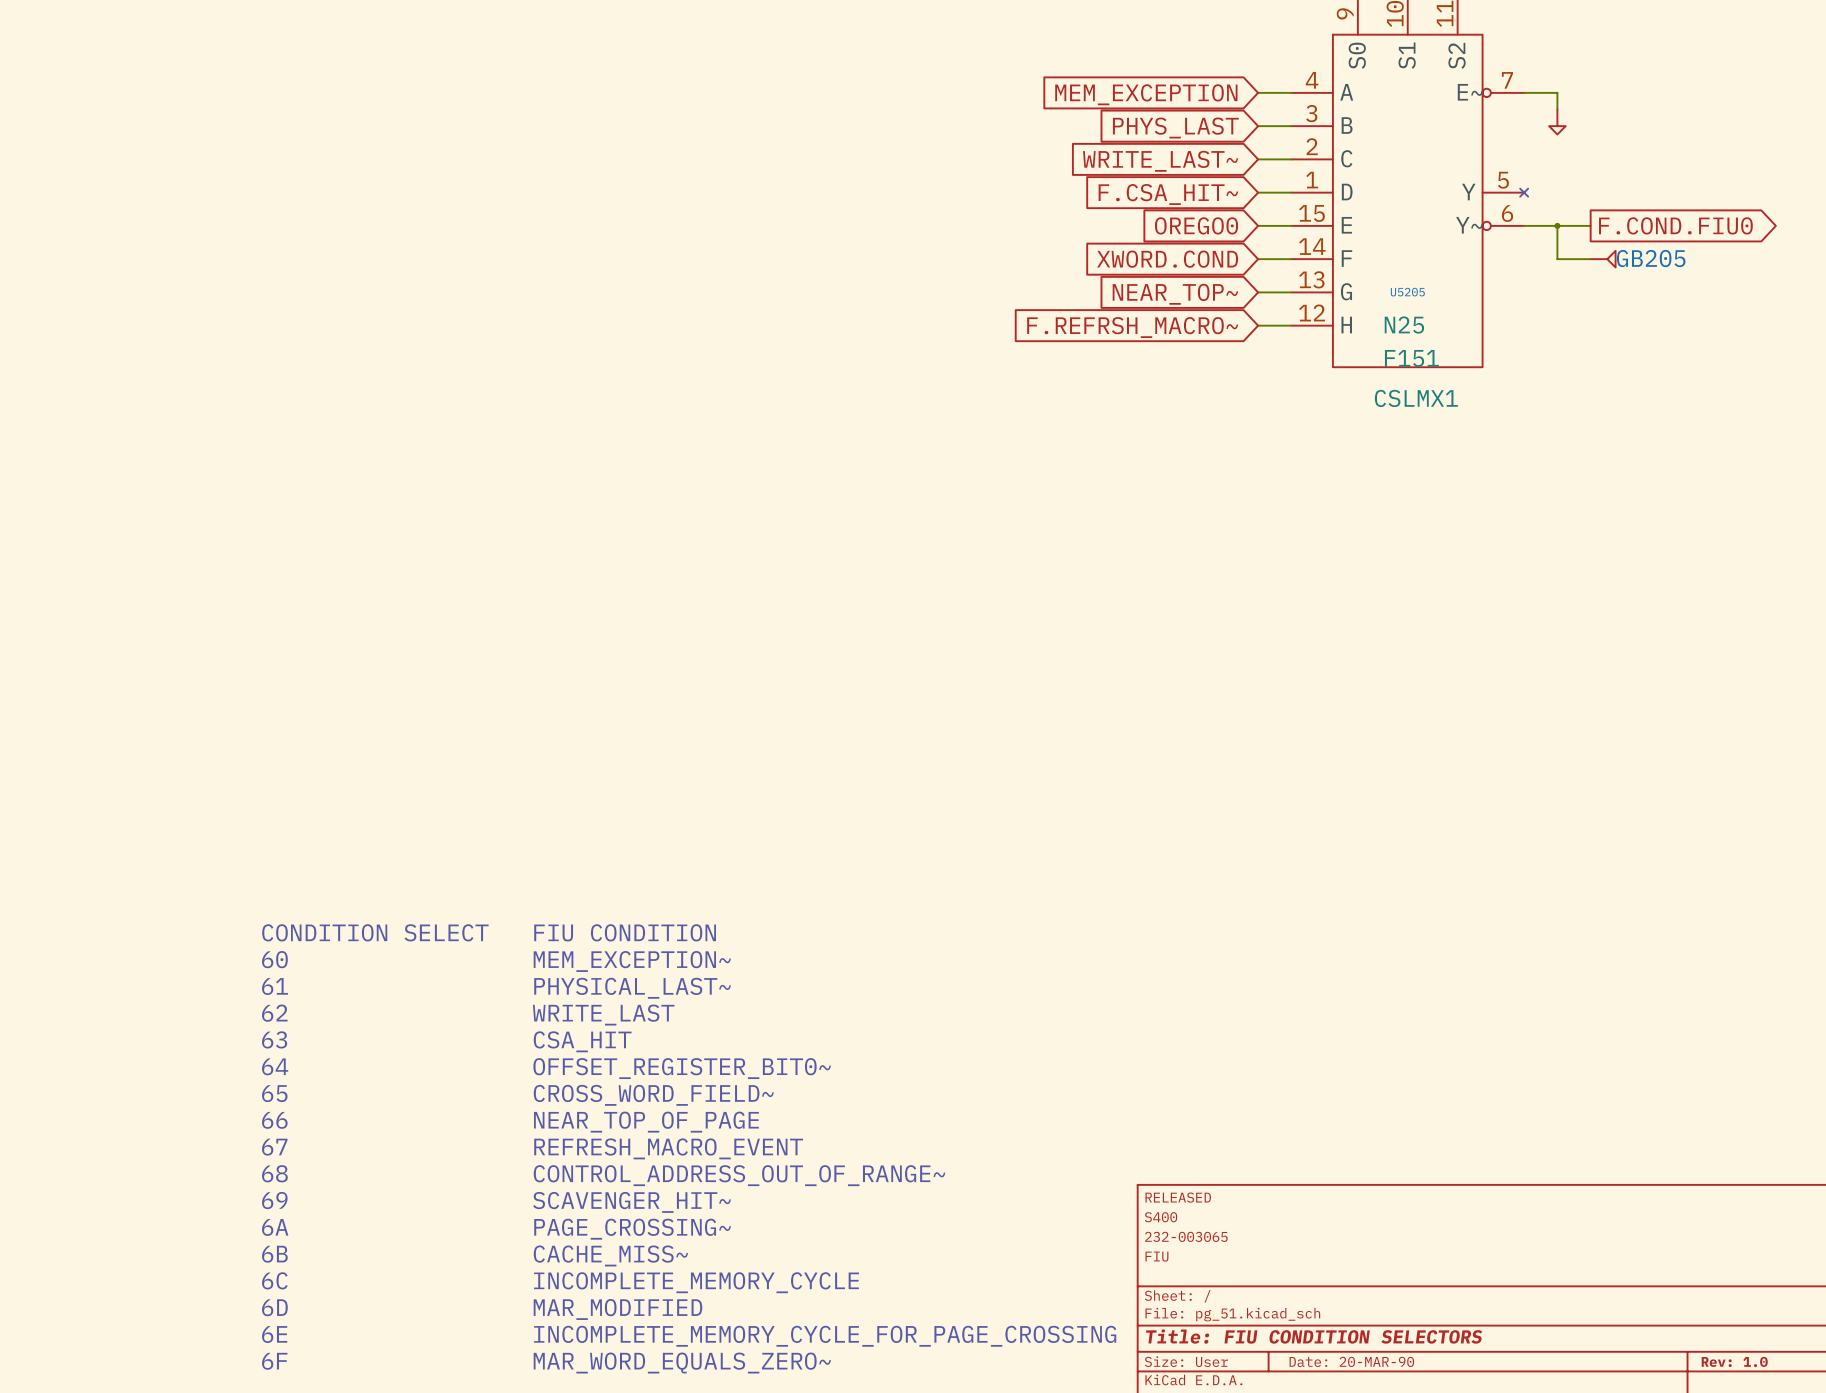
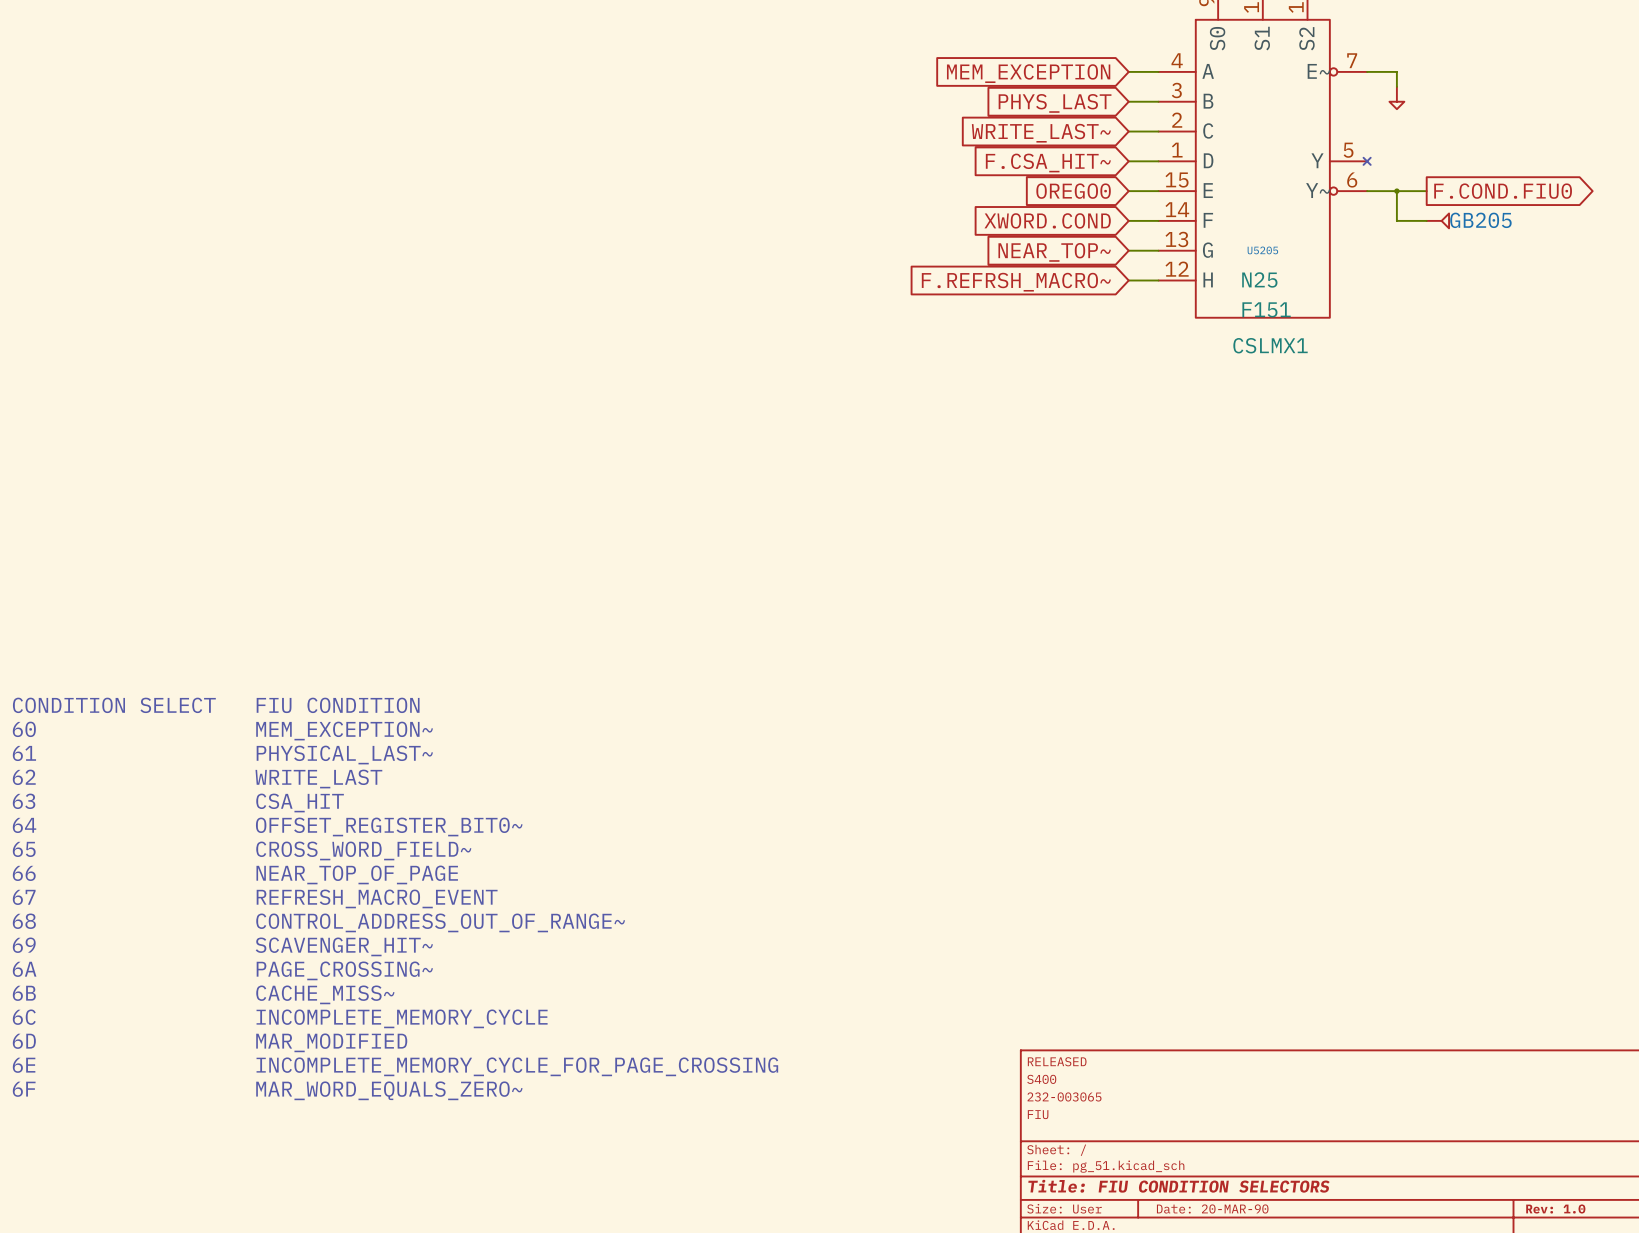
text: none -> CONDITION SELECT FIU CONDITION (216, 705)
text: none -> 60 MEM_EXCEPTION~ (222, 731)
text: none -> 61 PHYSICAL_LAST~ (222, 755)
text: none -> 62 WRITE_LAST (197, 779)
text: none -> 63 CSA_HIT (178, 802)
text: CONDITION SELECT FIU CONDITION (489, 932) -> none
text: none -> 64 OFFSET_REGISTER_BIT0~ (267, 826)
text: 60 MEM_EXCEPTION~ (496, 961) -> none
text: none -> 65 CROSS_WORD_FIELD~ (242, 850)
text: 61 PHYSICAL_LAST~ (496, 988) -> none
text: none -> 66 NEAR_TOP_OF_PAGE (235, 874)
text: none -> 67 REFRESH_MACRO_EVENT (255, 898)
text: 62 WRITE_LAST (468, 1015) -> none
text: 63 CSA_HIT (446, 1041) -> none
text: none -> 68 CONTROL_ADDRESS_OUT_OF_RANGE~ (318, 922)
text: 64 OFFSET_REGISTER_BIT0~ (546, 1068) -> none
text: none -> 69 SCAVENGER_HIT~ (222, 946)
text: 65 CROSS_WORD_FIELD~ (517, 1095) -> none
text: none -> 6A PAGE_CROSSING~ (222, 970)
text: none -> 6B CACHE_MISS~ (203, 994)
text: 66 NEAR_TOP_OF_PAGE (510, 1122) -> none
text: 67 REFRESH_MACRO_EVENT (532, 1148) -> none
text: none -> 6C INCOMPLETE_MEMORY_CYCLE (280, 1018)
text: 68 CONTROL_ADDRESS_OUT_OF_RANGE~ (603, 1175) -> none
text: none -> 6D MAR_MODIFIED (210, 1042)
text: 69 SCAVENGER_HIT~ (496, 1202) -> none
text: none -> 6E INCOMPLETE_MEMORY_CYCLE_FOR_PAGE_CROSSING (395, 1066)
text: 6A PAGE_CROSSING~ (496, 1229) -> none
text: none -> 6F MAR_WORD_EQUALS_ZERO~ (267, 1090)
text: 6B CACHE_MISS~ (475, 1255) -> none
text: 6C INCOMPLETE_MEMORY_CYCLE (560, 1282) -> none
text: 6D MAR_MODIFIED (482, 1309) -> none
text: 6E INCOMPLETE_MEMORY_CYCLE_FOR_PAGE_CROSSING (689, 1336) -> none
text: 6F MAR_WORD_EQUALS_ZERO~ (546, 1363) -> none

